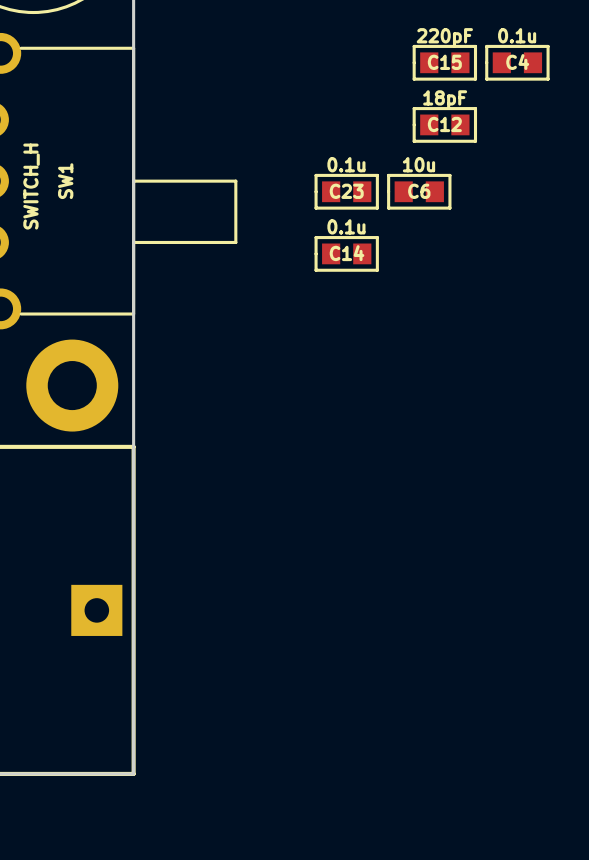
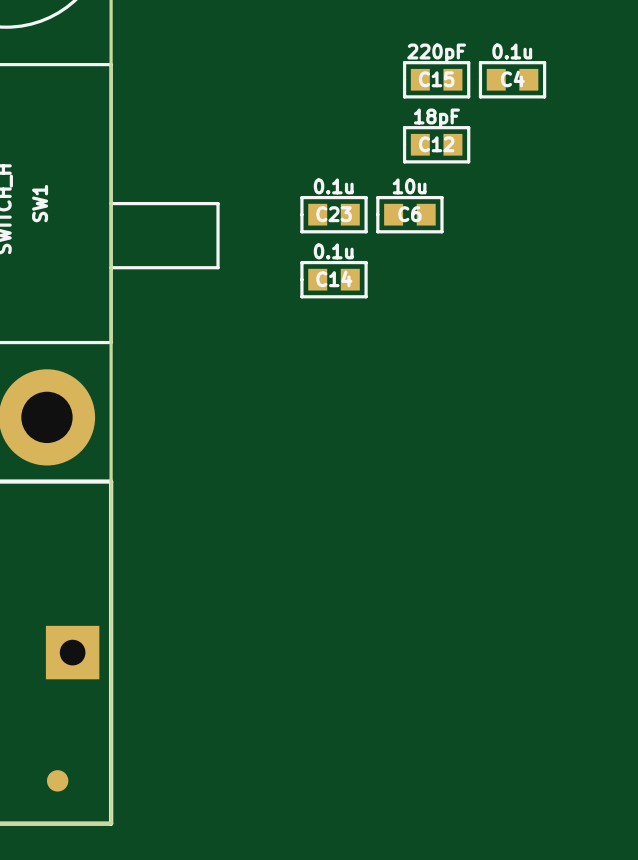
part: none -> (57, 780)

